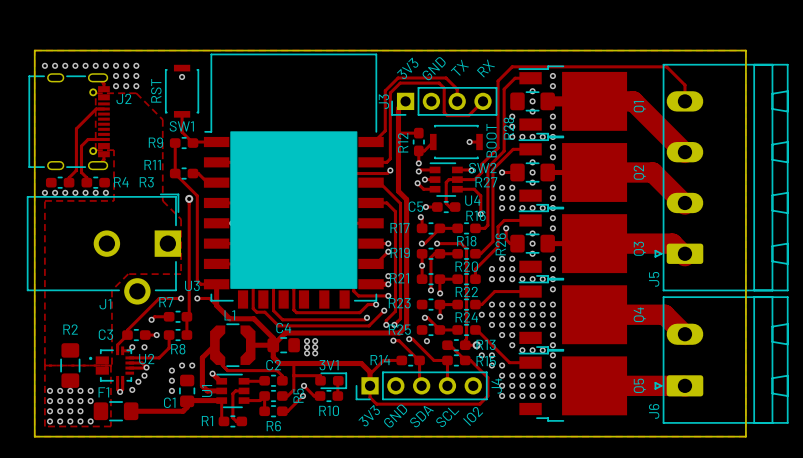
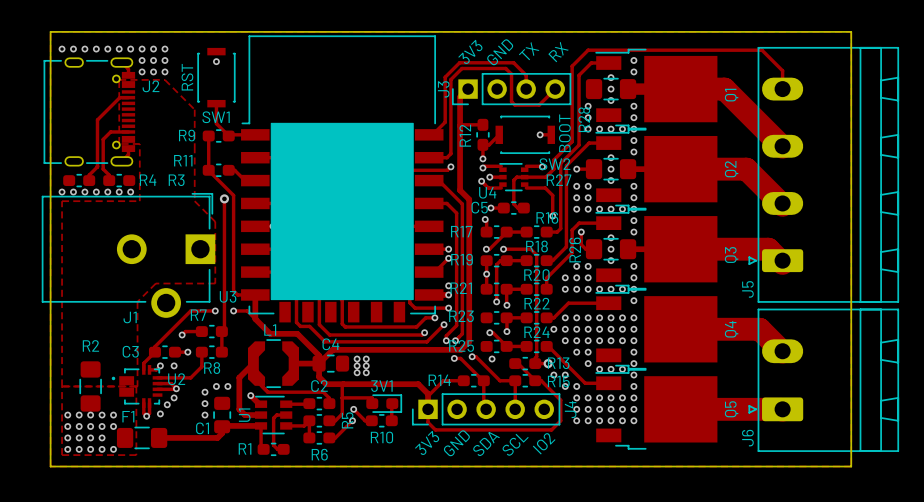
U4 footprint: [429, 162, 463, 197] -> [499, 163, 529, 192]
U4 name position: U4 (472, 200) -> U4 (487, 192)

